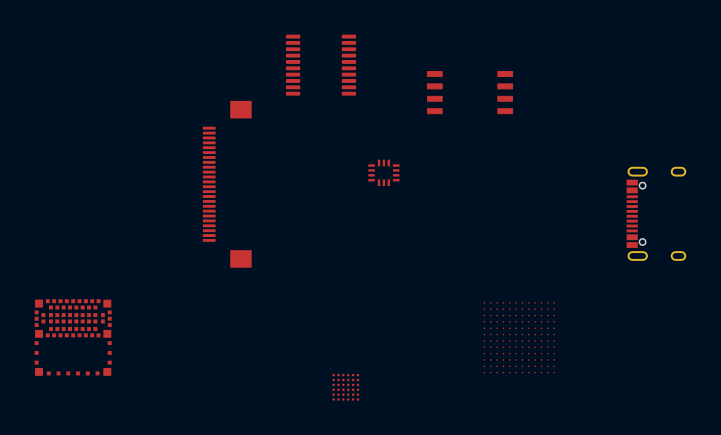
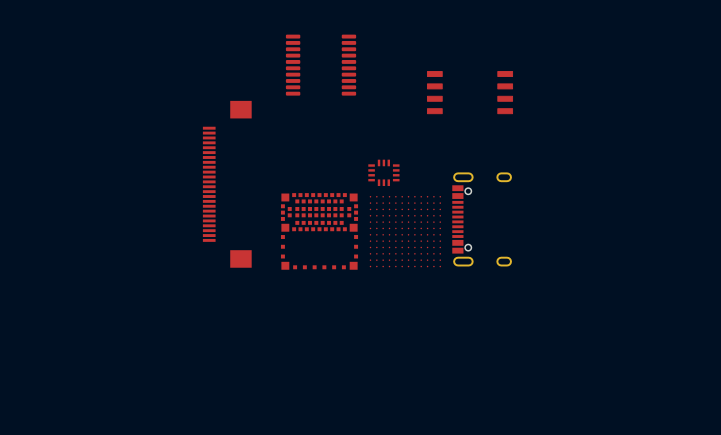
part position: (656, 213) -> (482, 219)
part: none -> (319, 231)
part: (73, 337) -> none
part position: (519, 337) -> (405, 231)
part: (345, 387) -> none

